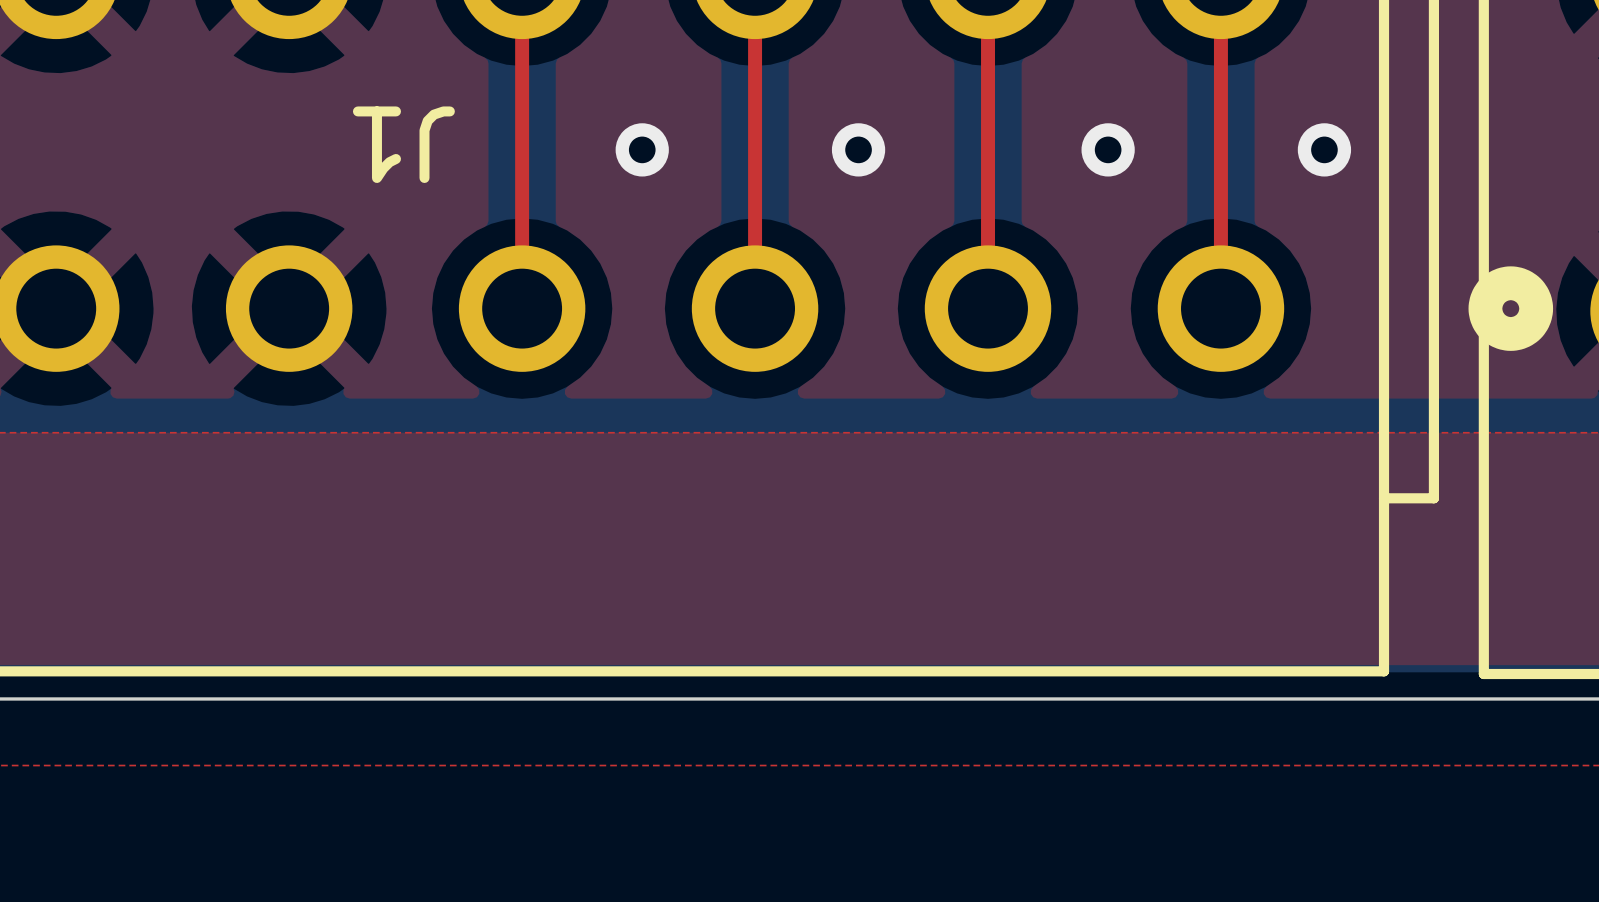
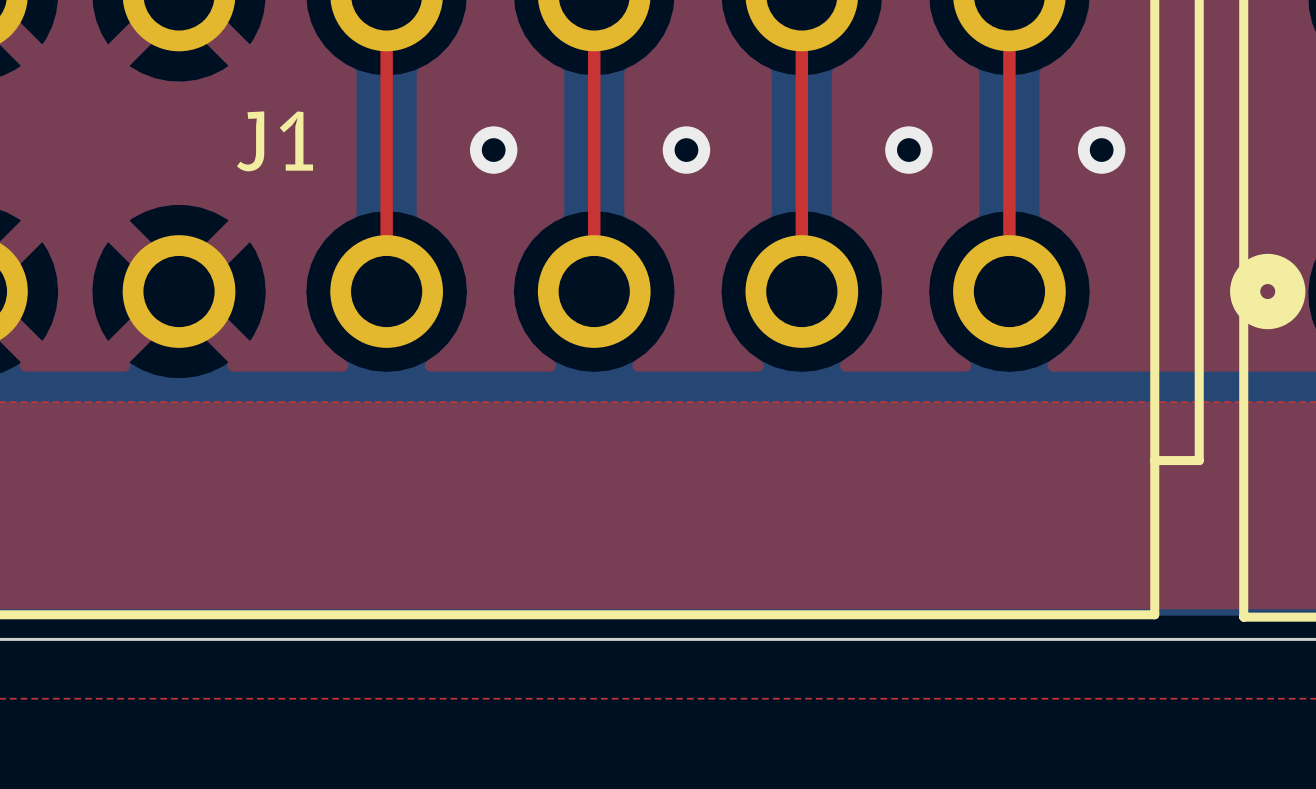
J1 name rotation: 0° (403, 144) -> 180° (274, 141)

